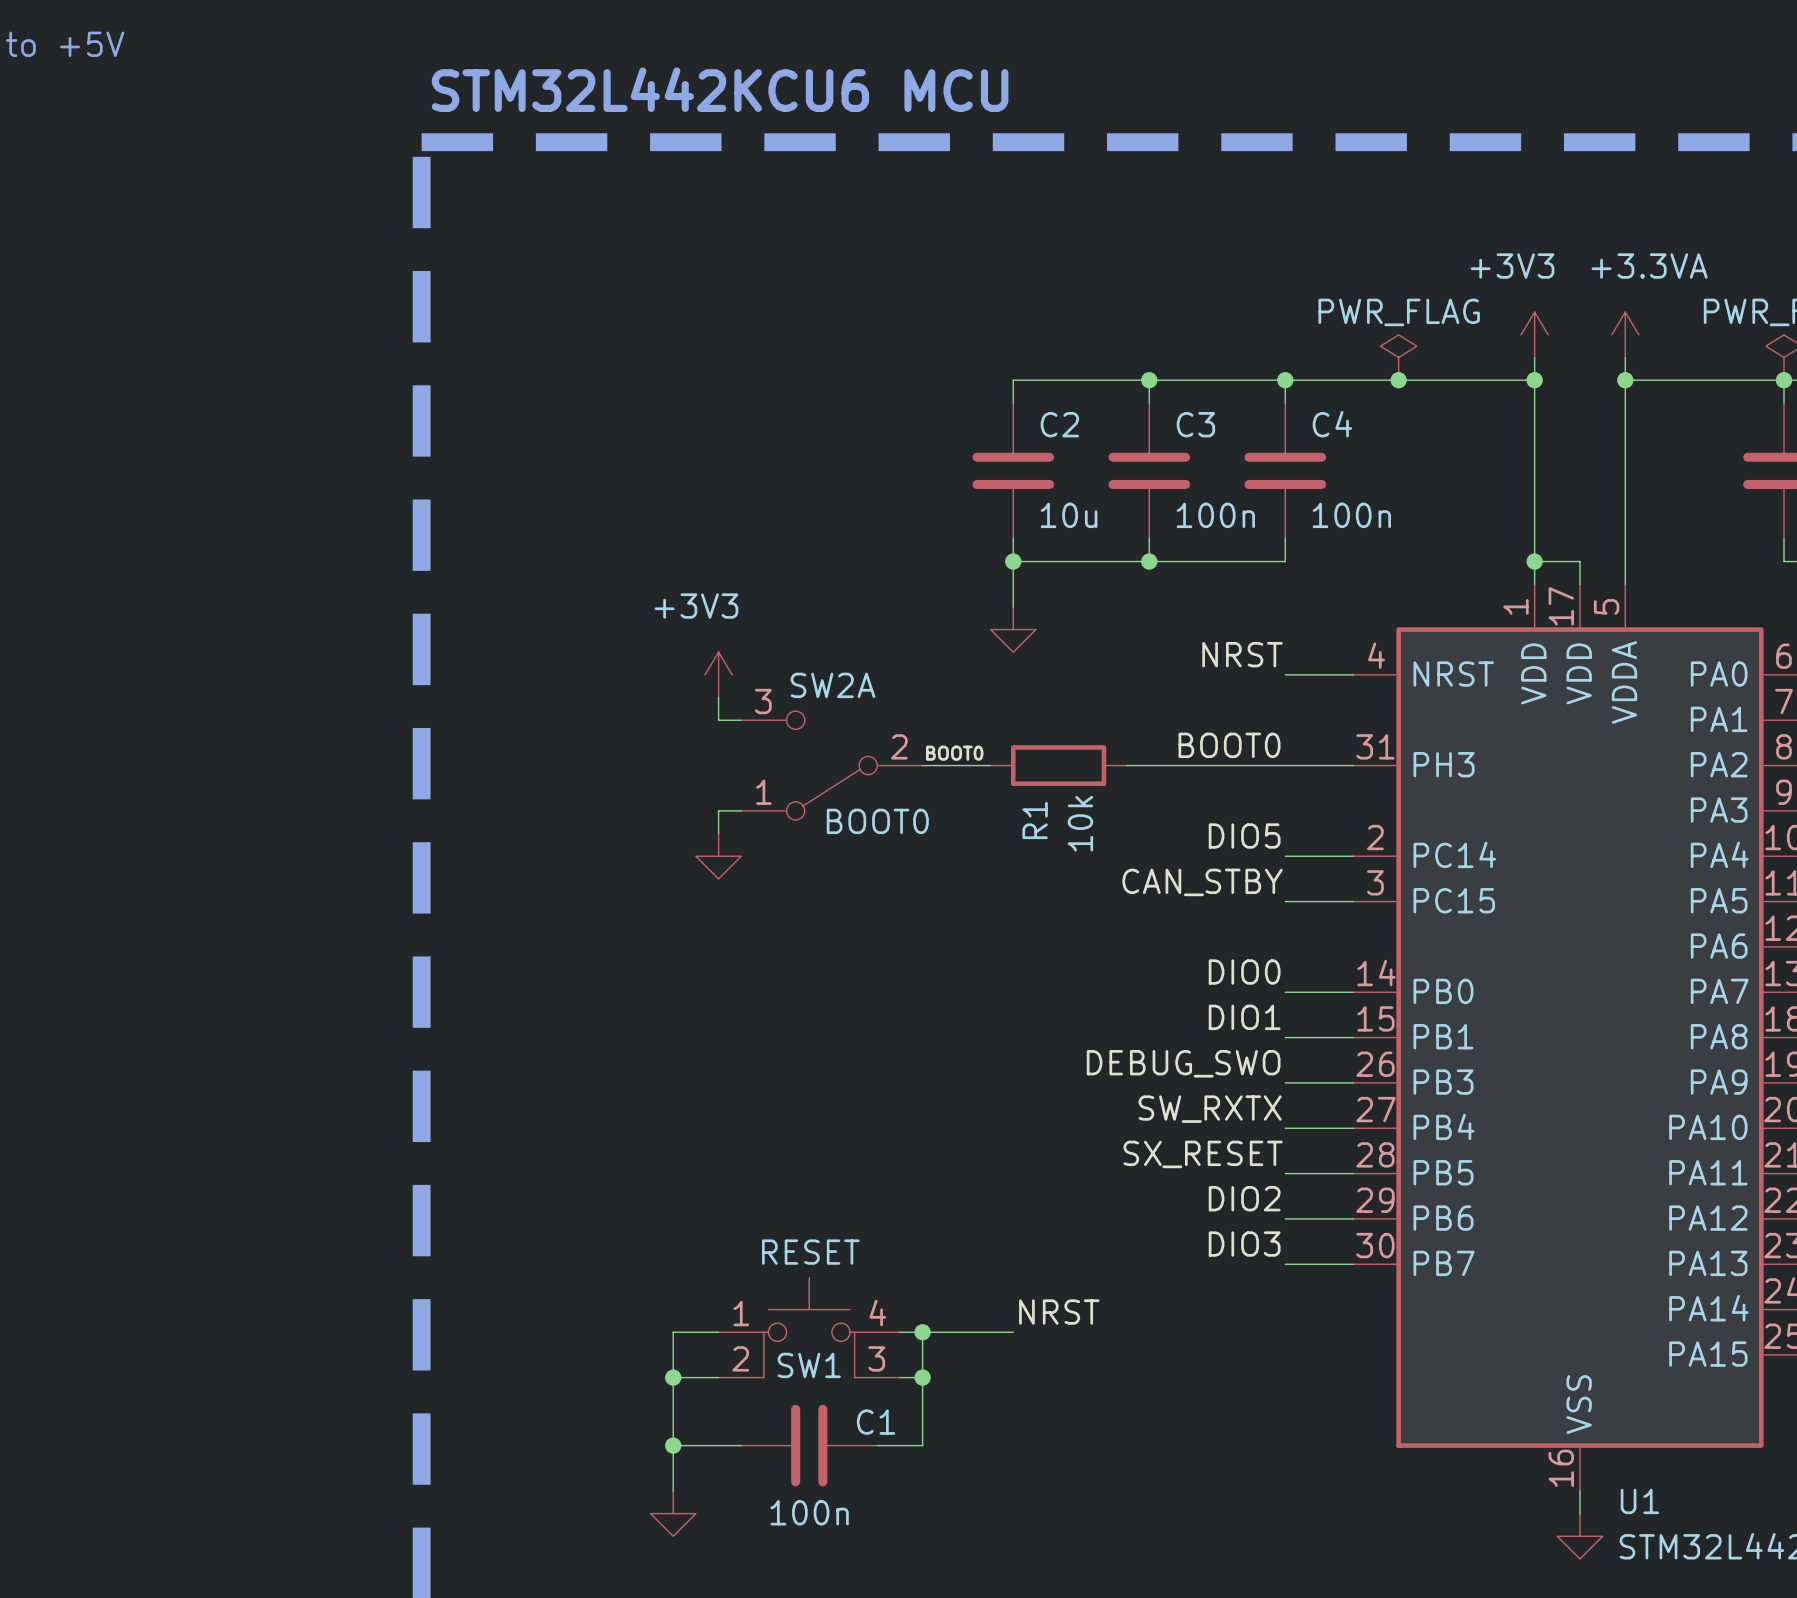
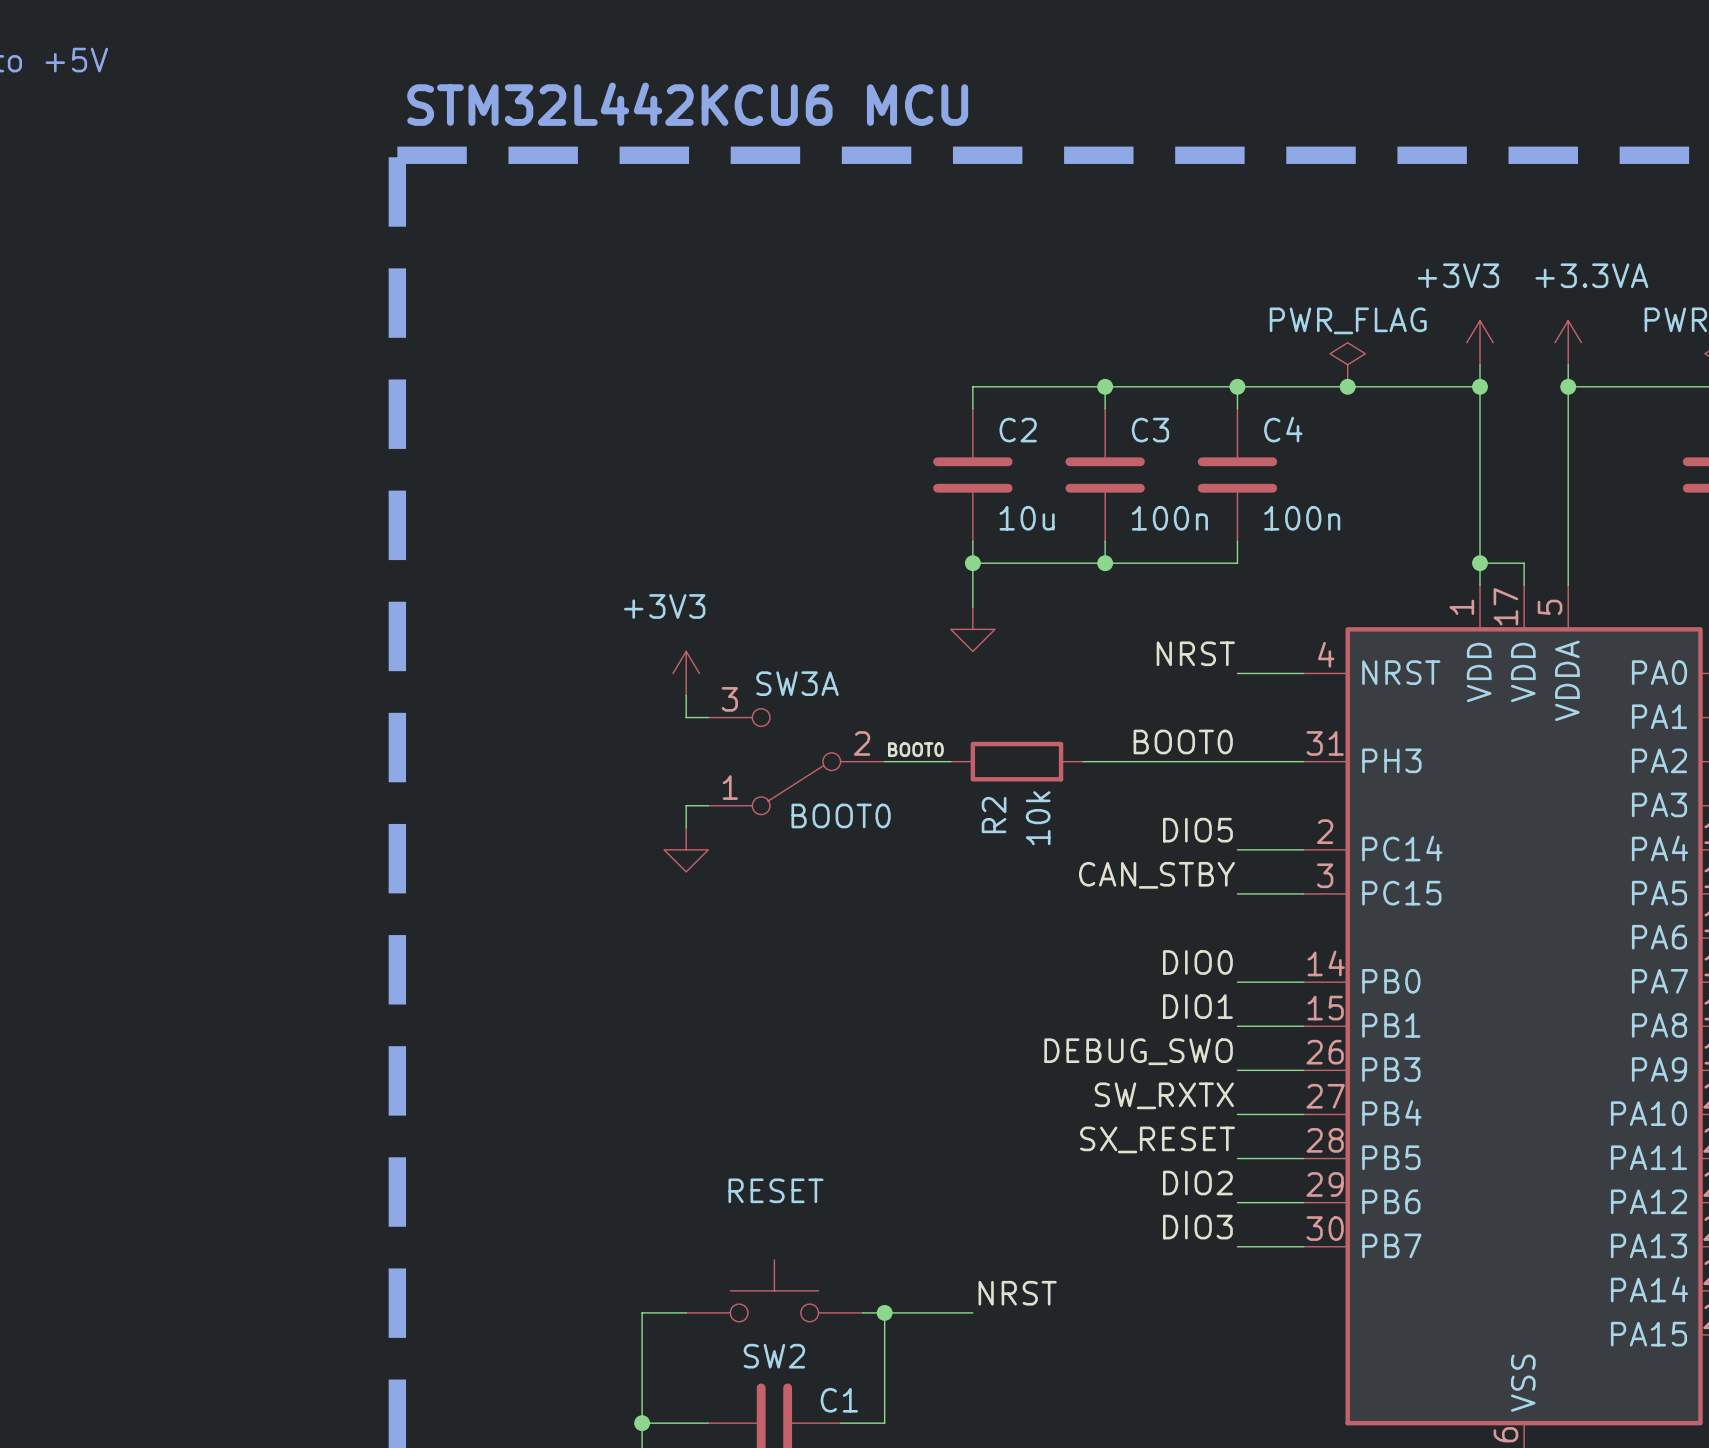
SW2A name: SW2A (833, 685) -> SW3A (797, 683)
R1 name: R1 (1035, 820) -> R2 (994, 815)
SW2: none -> RESET (774, 1290)
SW1: RESET (809, 1327) -> none
wire: (673, 1377) (718, 1377) -> none
junction: (673, 1377) -> none
wire: (899, 1377) (922, 1377) -> none
junction: (922, 1377) -> none

